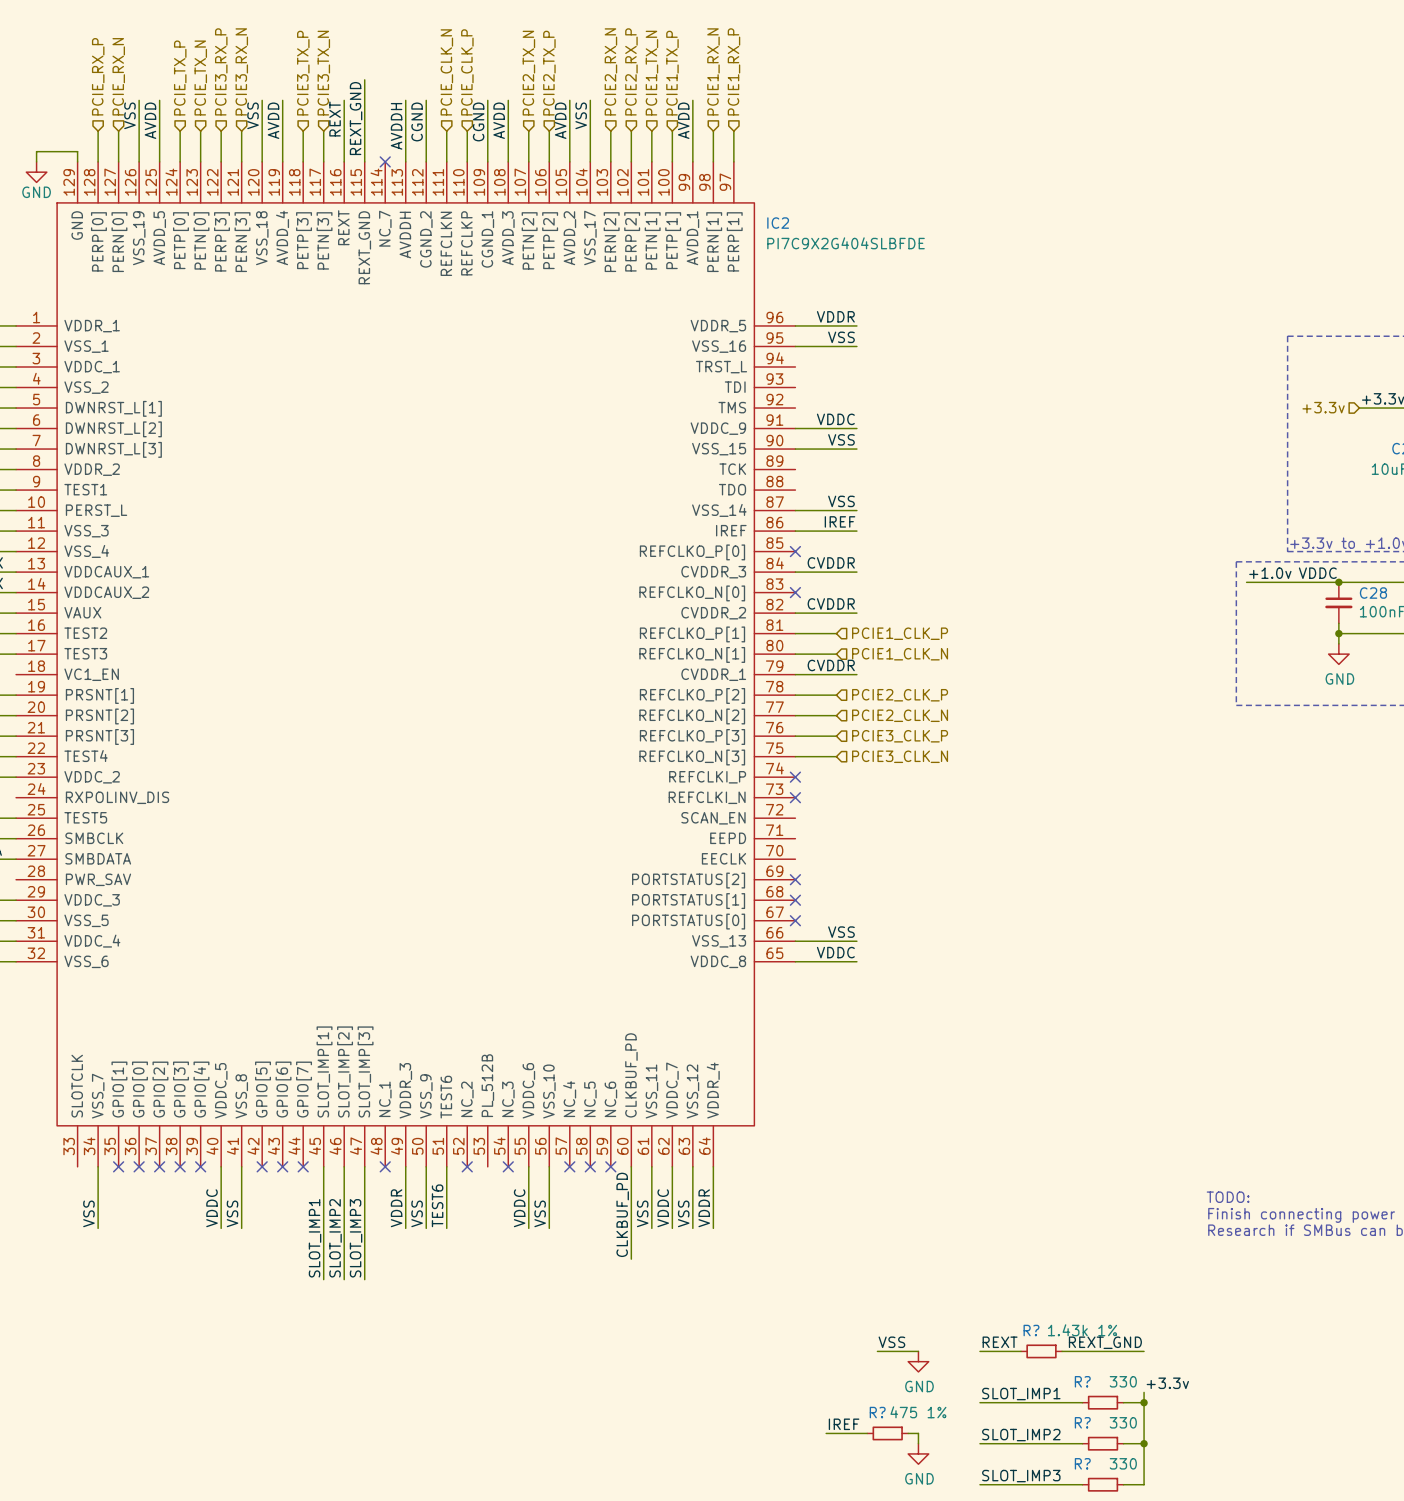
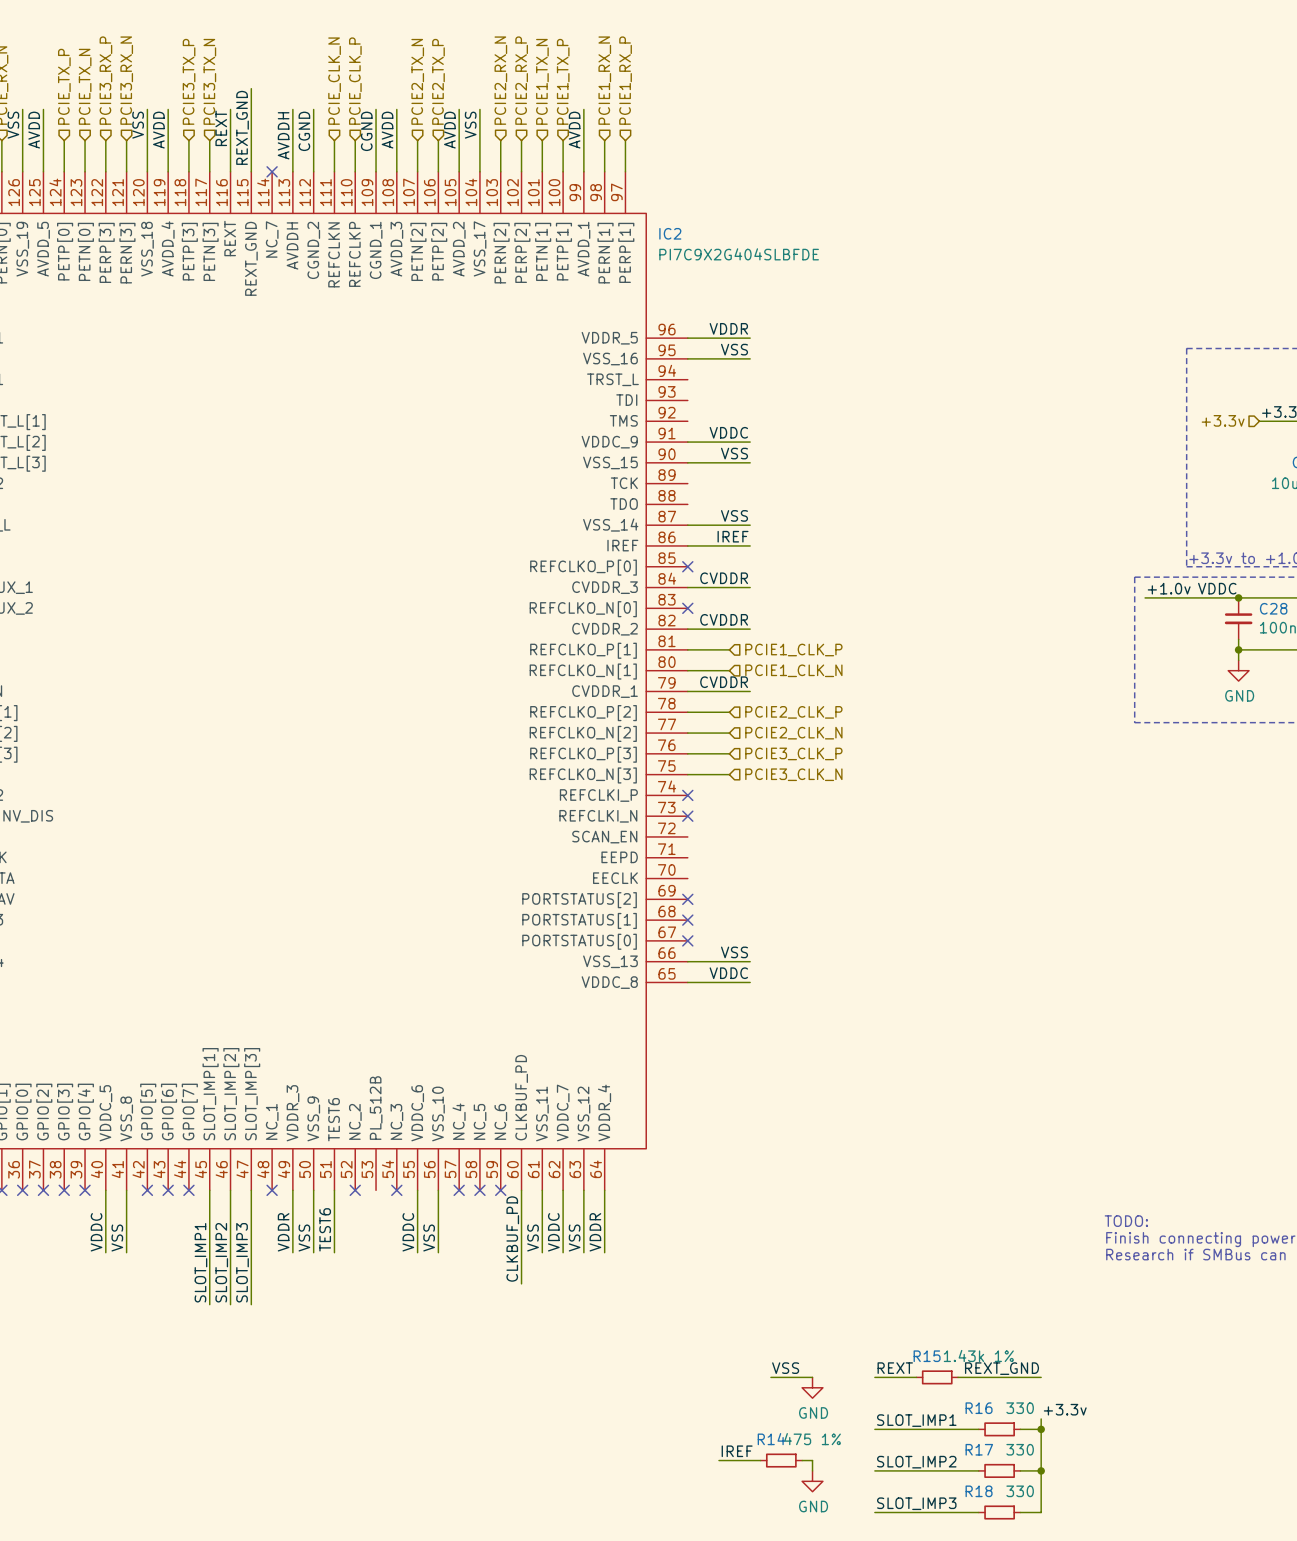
R? name: R? (1031, 1330) -> R15 (927, 1356)
R? name: R? (1082, 1381) -> R16 (979, 1408)
R? name: R? (877, 1412) -> R14 (771, 1439)
R? name: R? (1082, 1422) -> R17 (979, 1449)
R? name: R? (1082, 1463) -> R18 (979, 1491)

